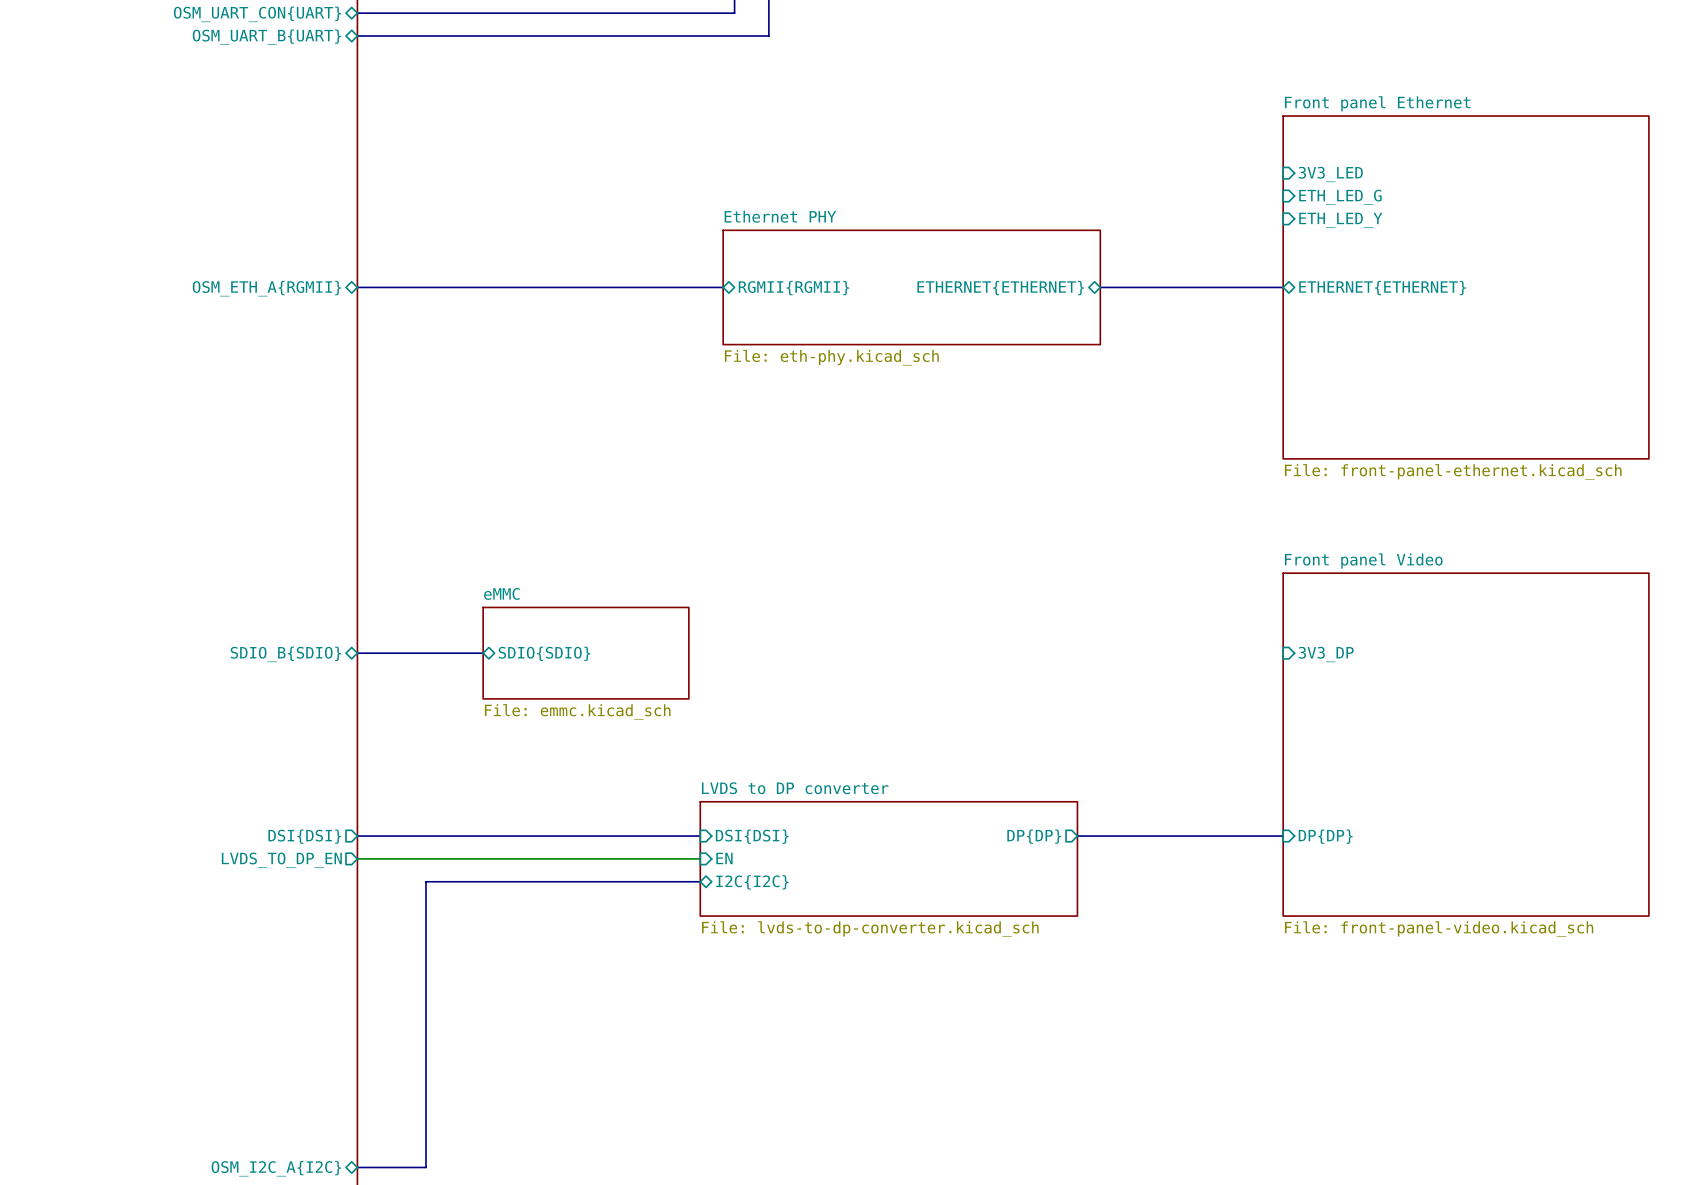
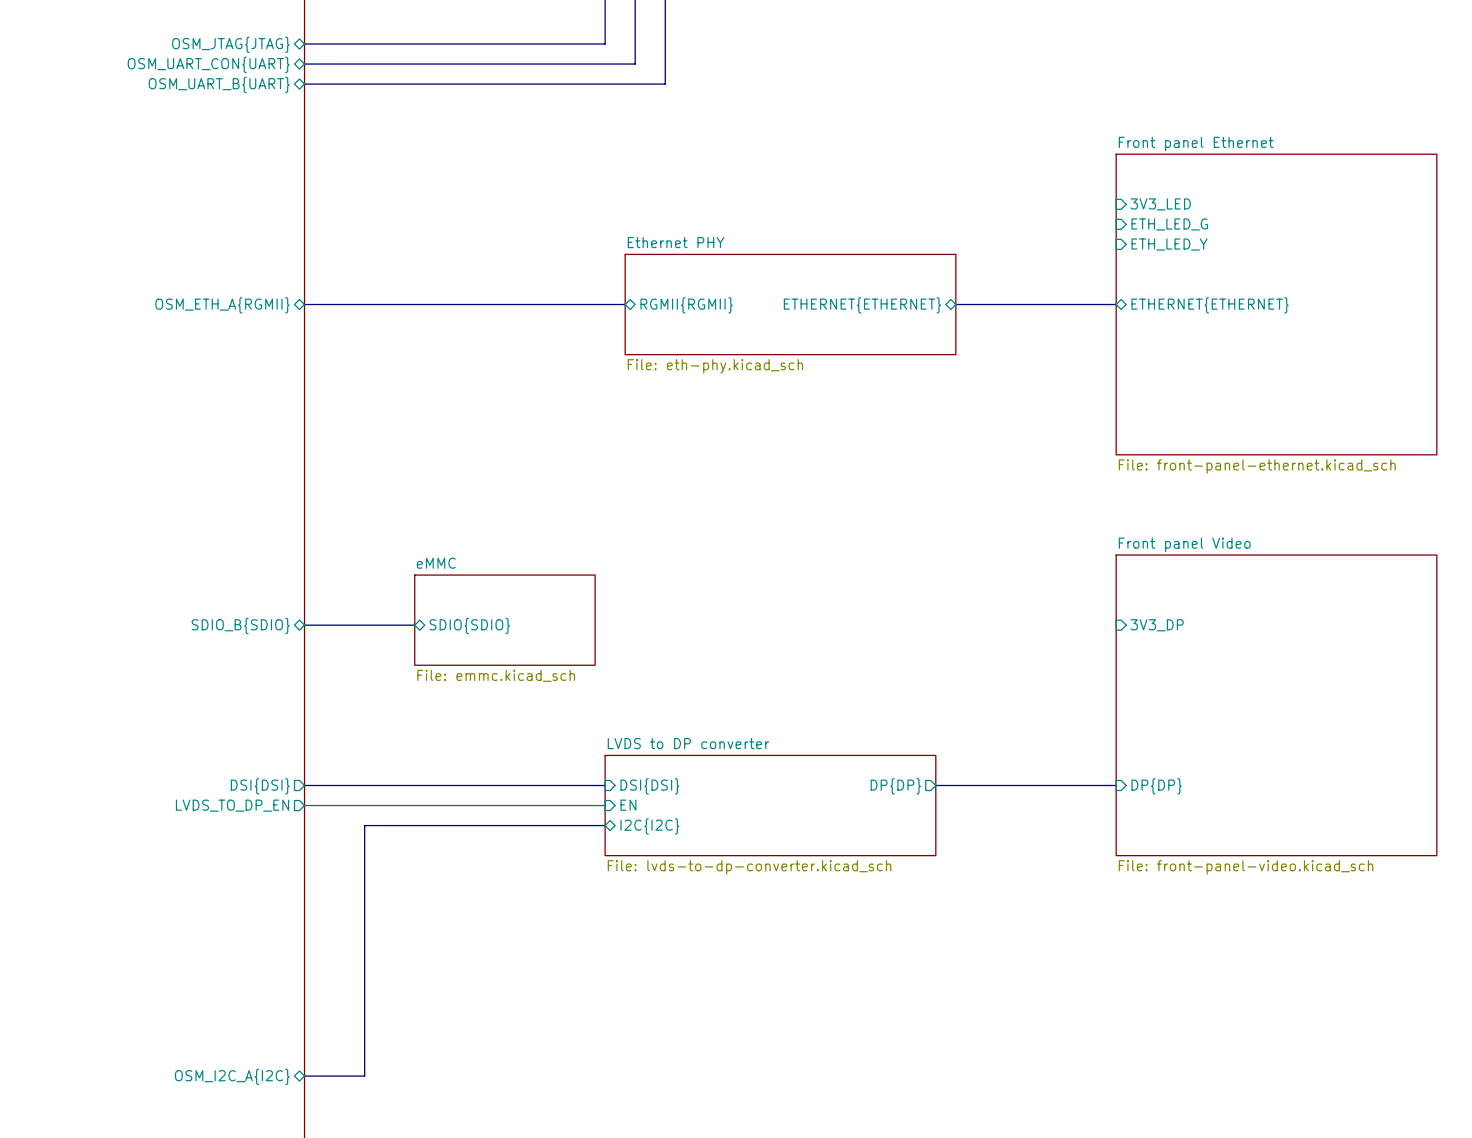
sheet eMMC shape: [482, 606, 690, 700] -> [414, 574, 596, 666]

